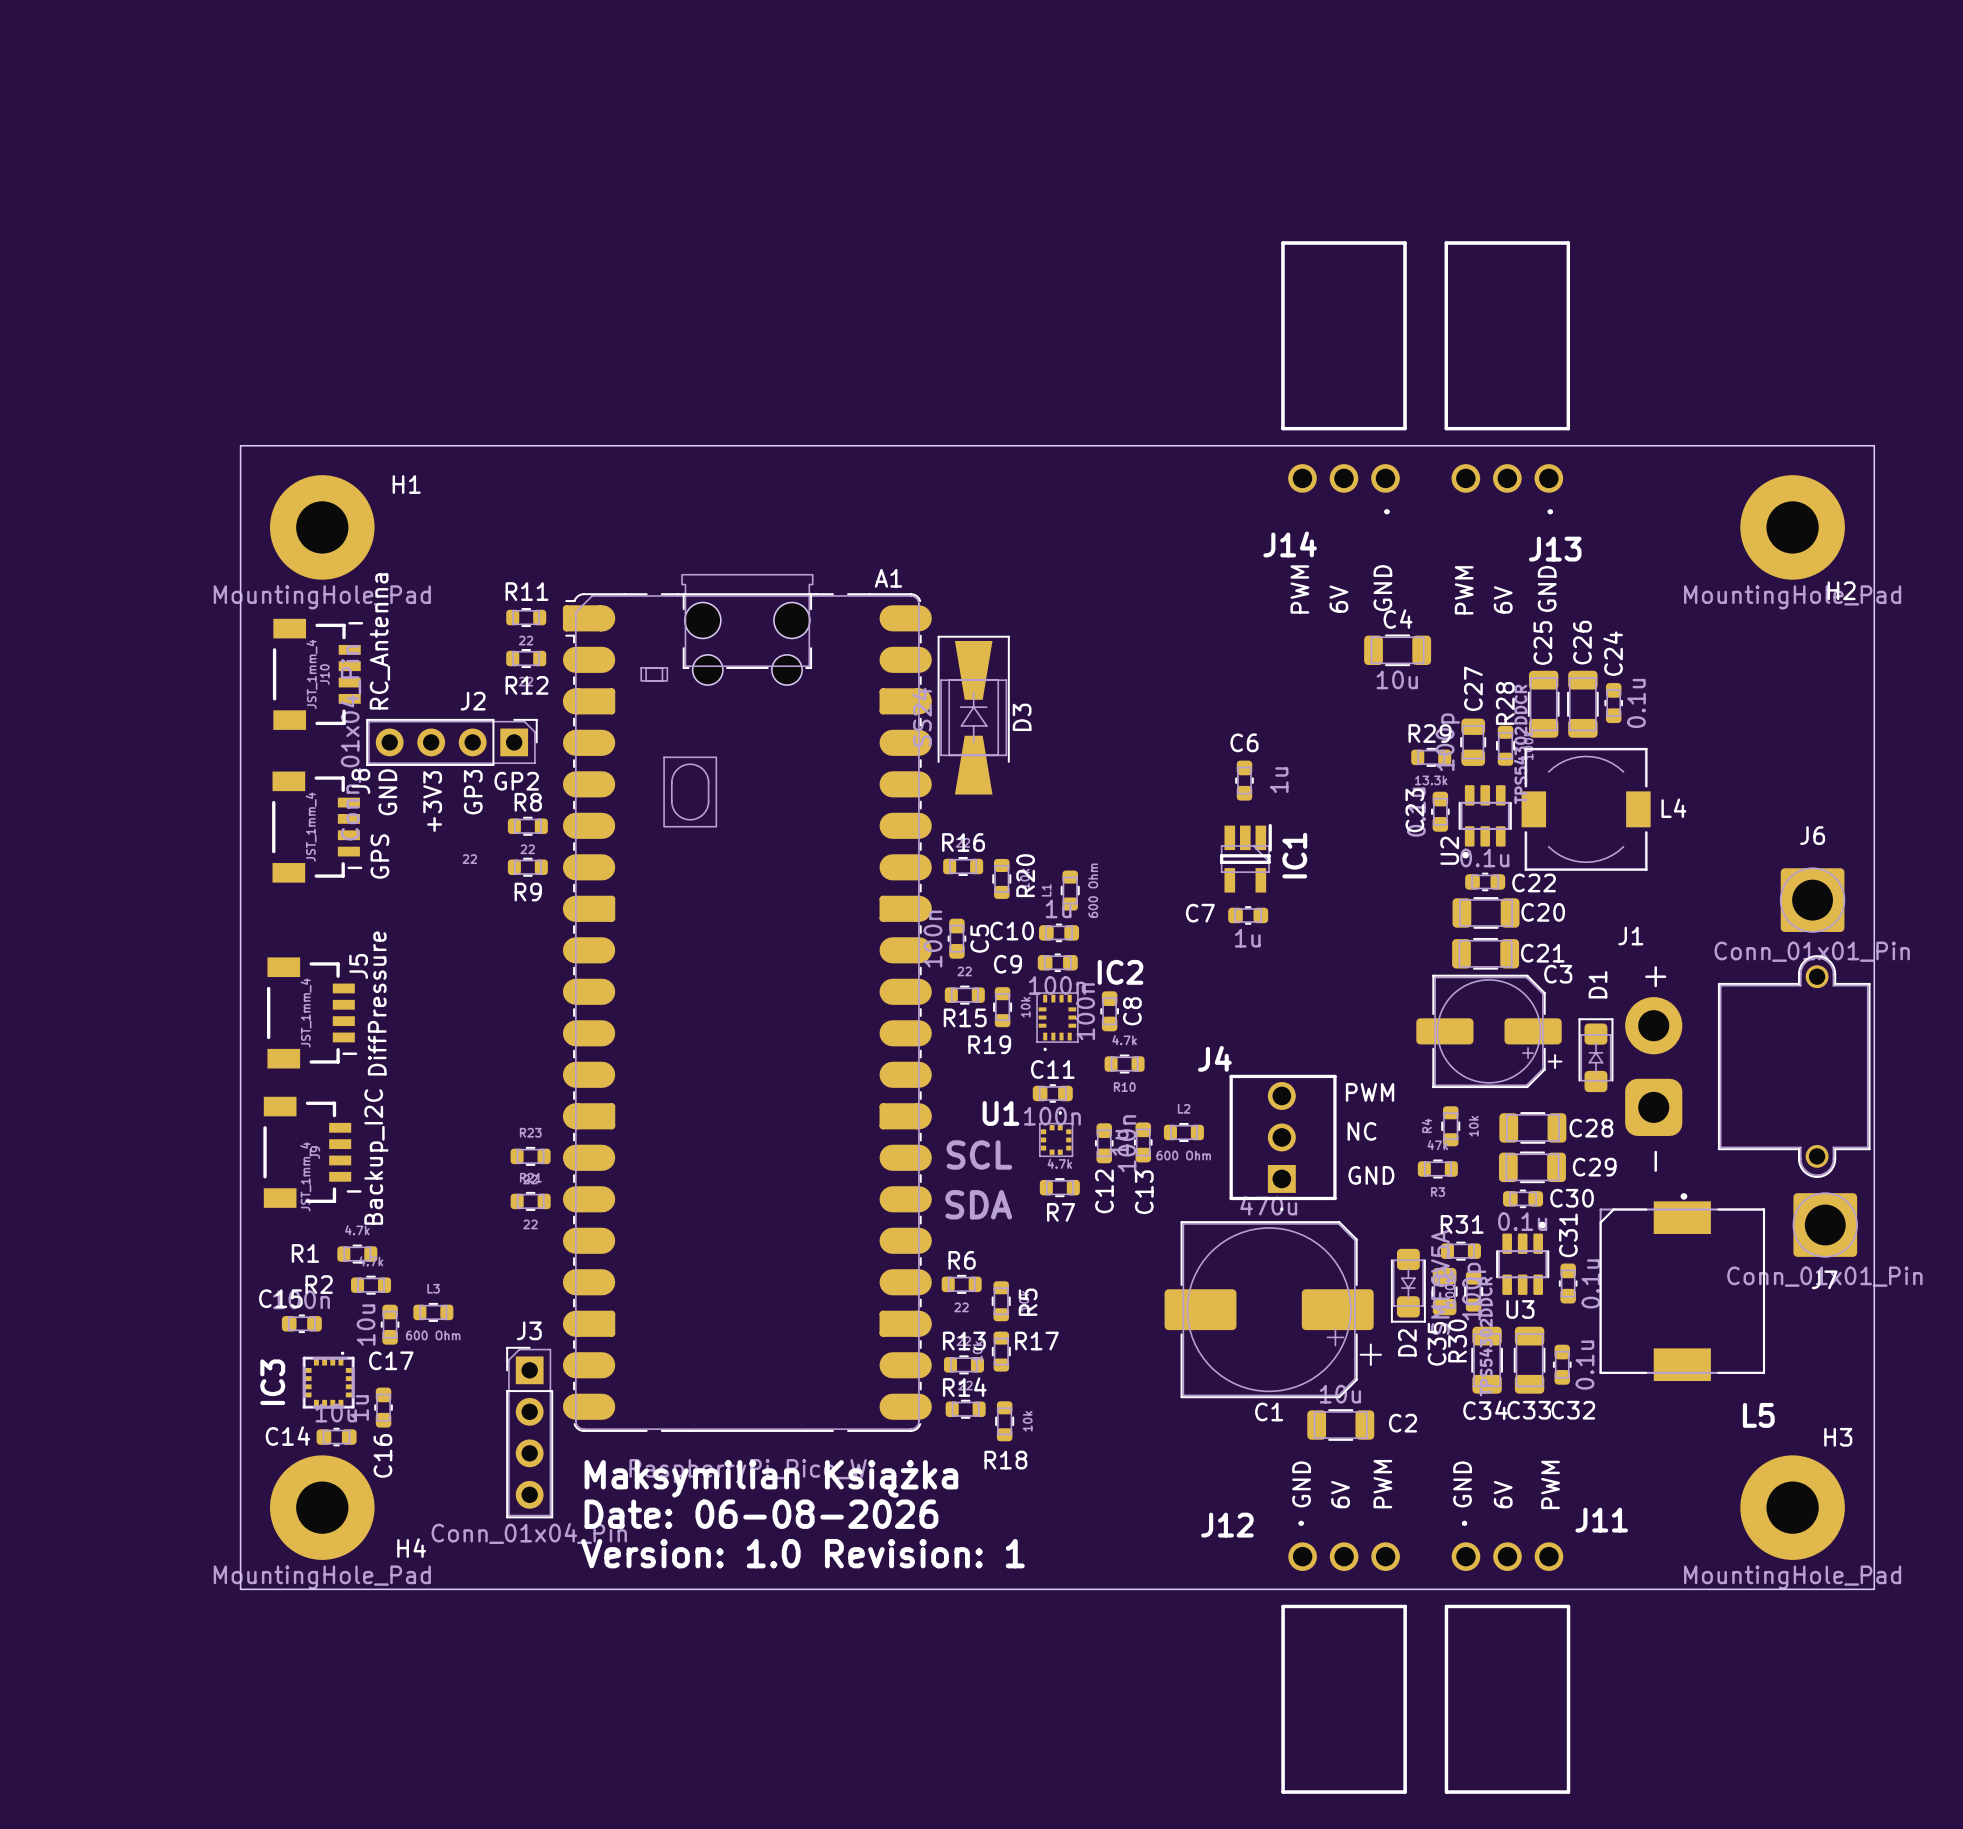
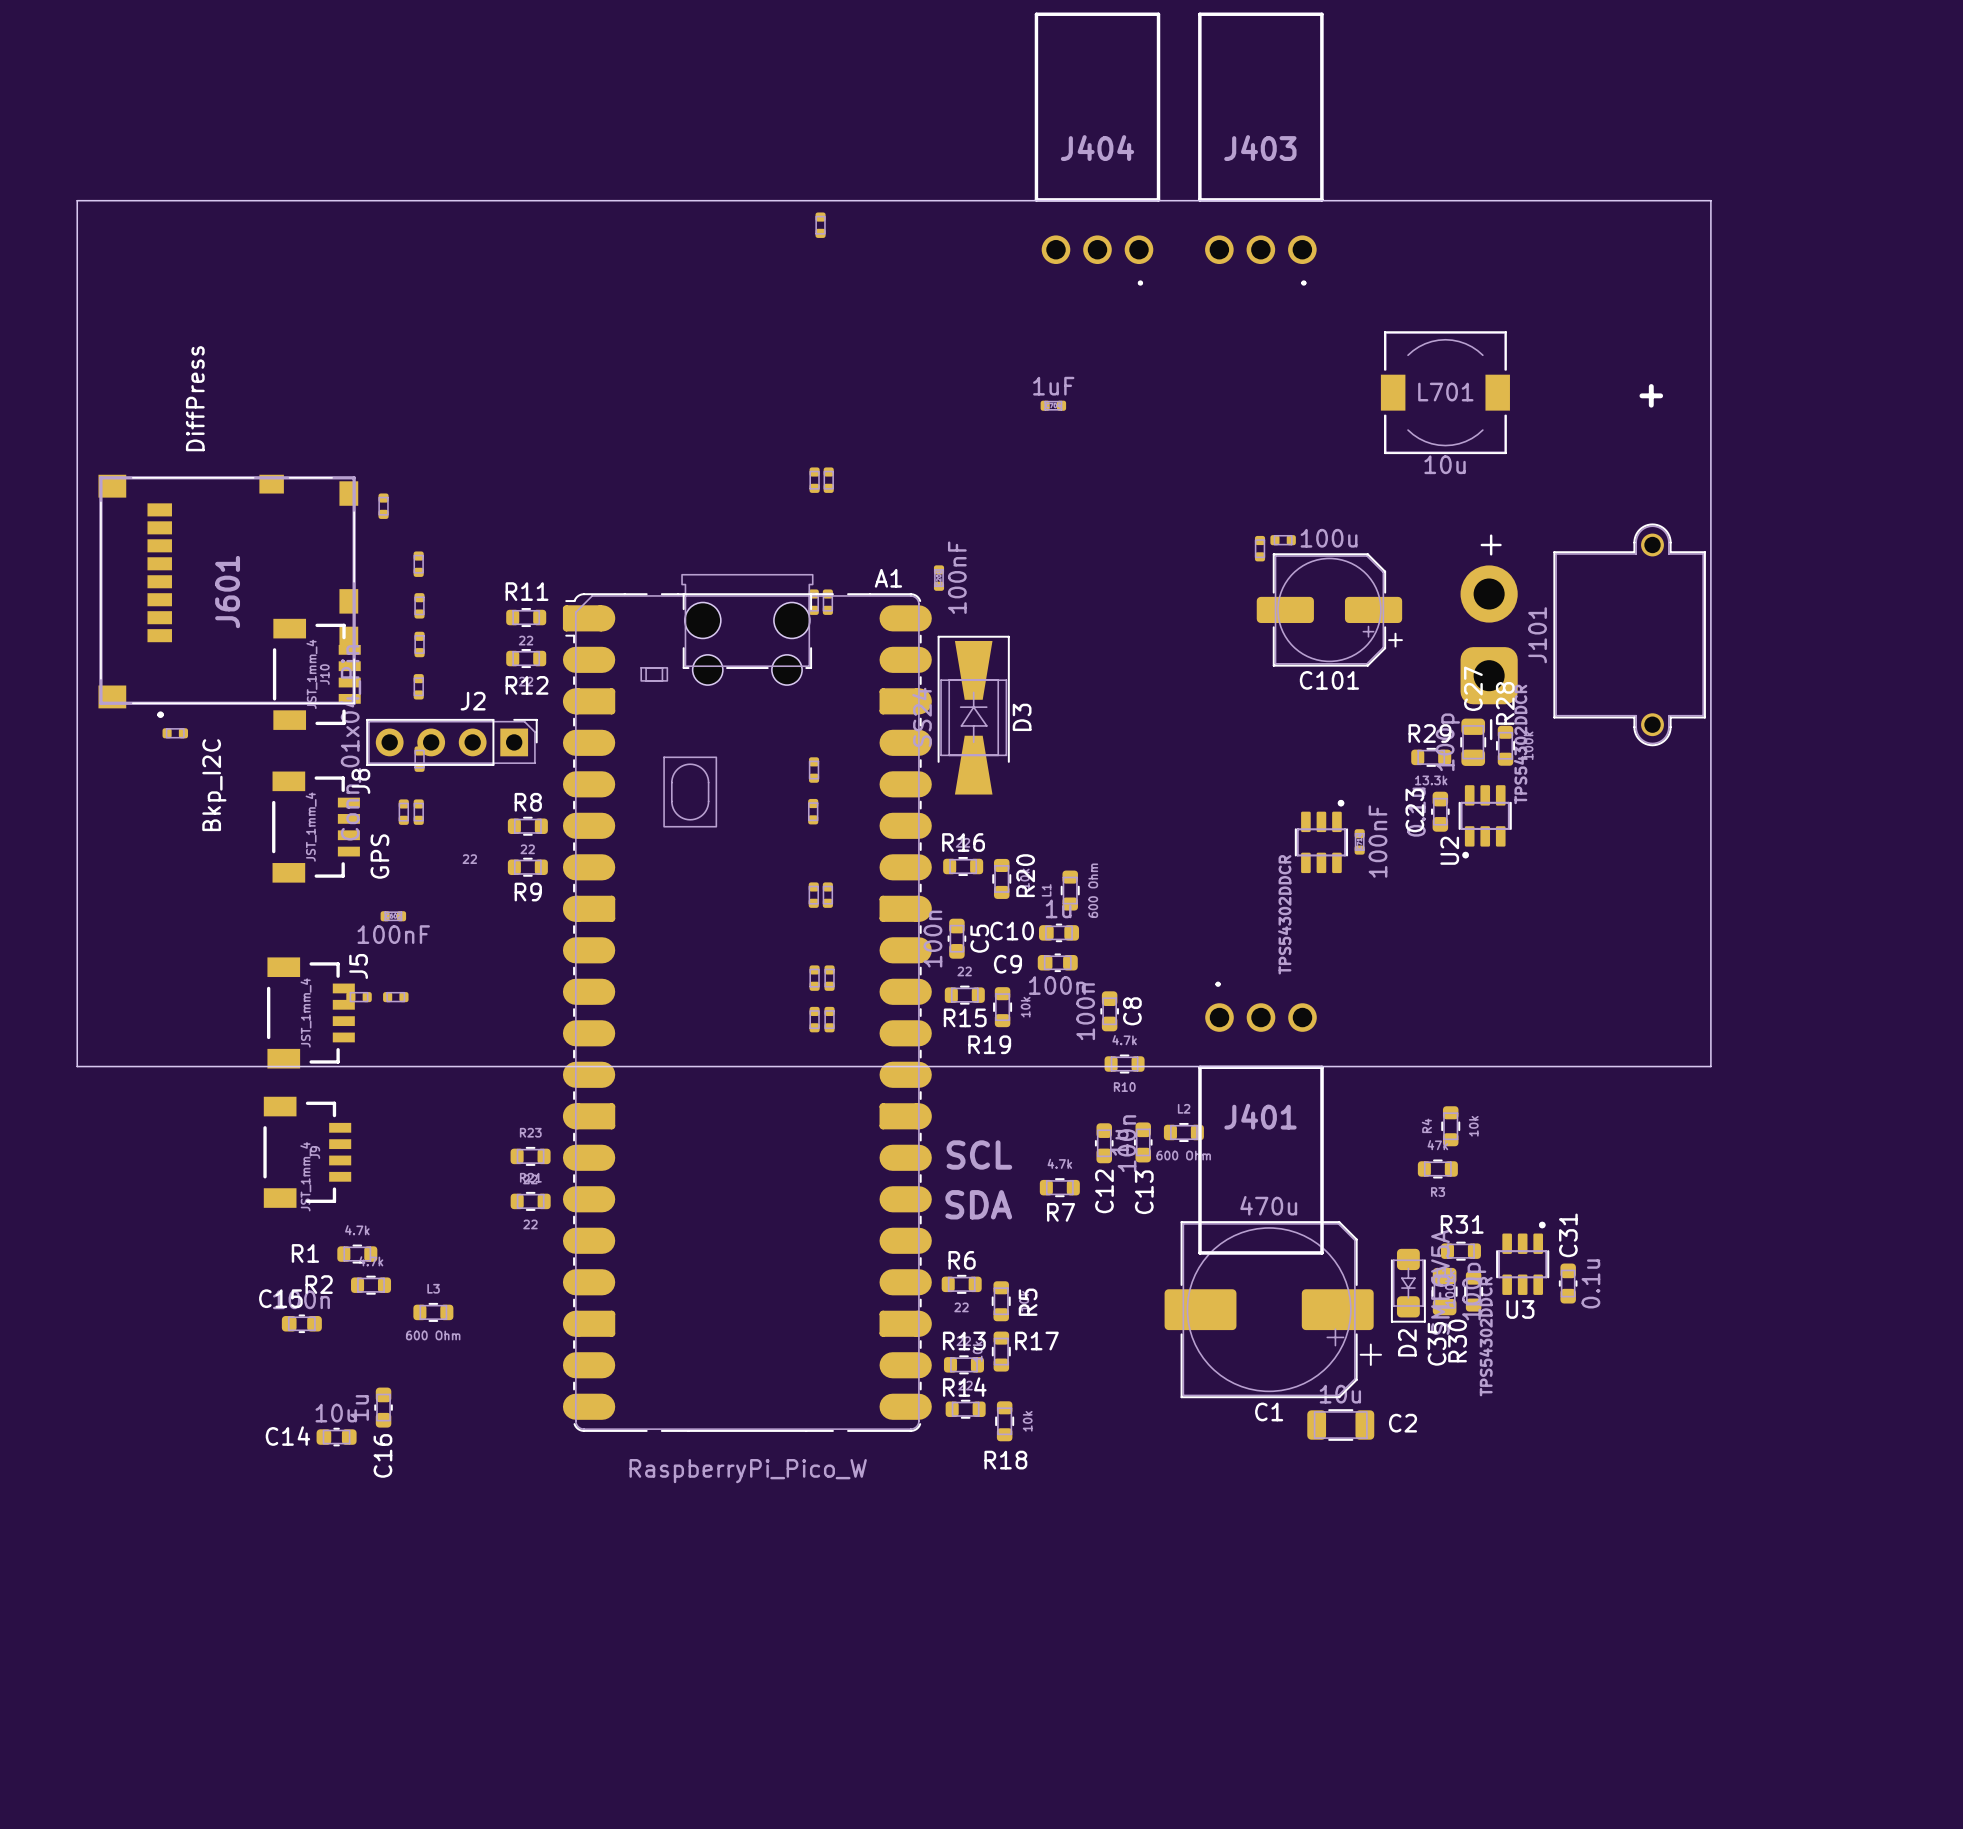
J404: none -> (1097, 149)
J403: none -> (1260, 149)
board edge: none -> (77, 200) (1710, 200) (1710, 1066) (77, 1066) (77, 200)
part: none -> (820, 225)
J14: (1343, 377) -> none
J13: (1507, 377) -> none
L701: none -> 10u (1445, 392)
text: none -> + (1651, 395)
text: none -> DiffPress (195, 398)
part: none -> 1uF (1053, 405)
board edge: (240, 445) (1874, 445) (1874, 1589) (240, 1589) (240, 445) -> none
part: none -> (814, 480)
part: none -> (828, 480)
part: none -> (383, 506)
H1: MountingHole_Pad (322, 527) -> none
H2: MountingHole_Pad (1792, 527) -> none
part: none -> (1283, 540)
part: none -> (1260, 548)
part: none -> (418, 564)
part: none -> 100nF (939, 578)
text: GND (1382, 588) -> none
text: GND (1547, 588) -> none
text: PWM (1299, 589) -> none
text: PWM (1464, 590) -> none
J601: none -> (228, 596)
text: 6V (1338, 599) -> none
text: 6V (1503, 599) -> none
part: none -> (813, 602)
part: none -> (827, 602)
part: none -> (419, 605)
C101: none -> 100u (1329, 609)
text: - (355, 623) -> none
J101: none -> (1583, 634)
text: RC_Antenna (379, 641) -> none
part: none -> (419, 644)
C4: 10u (1397, 650) -> none
part: none -> (418, 686)
C24: 0.1u (1613, 703) -> none
C25: (1543, 704) -> none
C26: (1582, 704) -> none
part: none -> (175, 733)
part: none -> (419, 759)
part: none -> (814, 770)
C6: 1u (1244, 780) -> none
text: GP2 (516, 781) -> none
text: none -> Bkp_I2C (214, 785)
text: GND (387, 792) -> none
text: GP3 (473, 792) -> none
text: +3V3 (432, 801) -> none
L4: (1586, 809) -> none
part: none -> (813, 811)
part: none -> (403, 812)
part: none -> (418, 812)
part: none -> TPS54302DDCR (1321, 836)
part: none -> 100nF (1359, 841)
IC1: (1245, 858) -> none
text: - (354, 867) -> none
C22: 0.1u (1485, 881) -> none
part: none -> (813, 895)
part: none -> (827, 895)
J6: Conn_01x01_Pin (1812, 900) -> none
C20: (1486, 912) -> none
C7: 1u (1248, 915) -> none
part: none -> 100nF (393, 916)
C21: (1485, 953) -> none
part: none -> (814, 978)
part: none -> (829, 978)
part: none -> (359, 997)
part: none -> (395, 997)
text: DiffPressure (377, 1003) -> none
part: none -> (814, 1019)
part: none -> (829, 1019)
IC2: (1057, 1021) -> none
C3: (1489, 1031) -> none
text: - (349, 1053) -> none
D1: (1595, 1055) -> none
J1: (1747, 1066) -> none
text: PWM (1370, 1092) -> none
C11: 100n (1052, 1093) -> none
J401: none -> (1261, 1118)
C28: (1532, 1127) -> none
text: NC (1361, 1131) -> none
U1: (1056, 1134) -> none
J4: (1283, 1142) -> none
text: Backup_I2C (376, 1157) -> none
C29: (1532, 1167) -> none
text: GND (1371, 1175) -> none
text: - (354, 1191) -> none
C30: 0.1u (1523, 1198) -> none
J7: Conn_01x01_Pin (1825, 1225) -> none
L5: (1682, 1287) -> none
C17: 10u (390, 1324) -> none
C34: (1487, 1360) -> none
C33: (1529, 1360) -> none
C32: 0.1u (1562, 1364) -> none
IC3: (328, 1380) -> none
J3: Conn_01x04_Pin (529, 1432) -> none
text: Maksymilian Książka (771, 1478) -> none
text: GND (1301, 1484) -> none
text: PWM (1382, 1484) -> none
text: GND (1462, 1484) -> none
text: PWM (1550, 1484) -> none
text: 6V (1340, 1494) -> none
text: 6V (1503, 1494) -> none
H4: MountingHole_Pad (322, 1507) -> none
H3: MountingHole_Pad (1792, 1507) -> none
text: Date: 06-08-2026 (761, 1514) -> none
text: Version: 1.0 Revision: 1 (802, 1553) -> none
J12: (1344, 1657) -> none
J11: (1507, 1657) -> none

